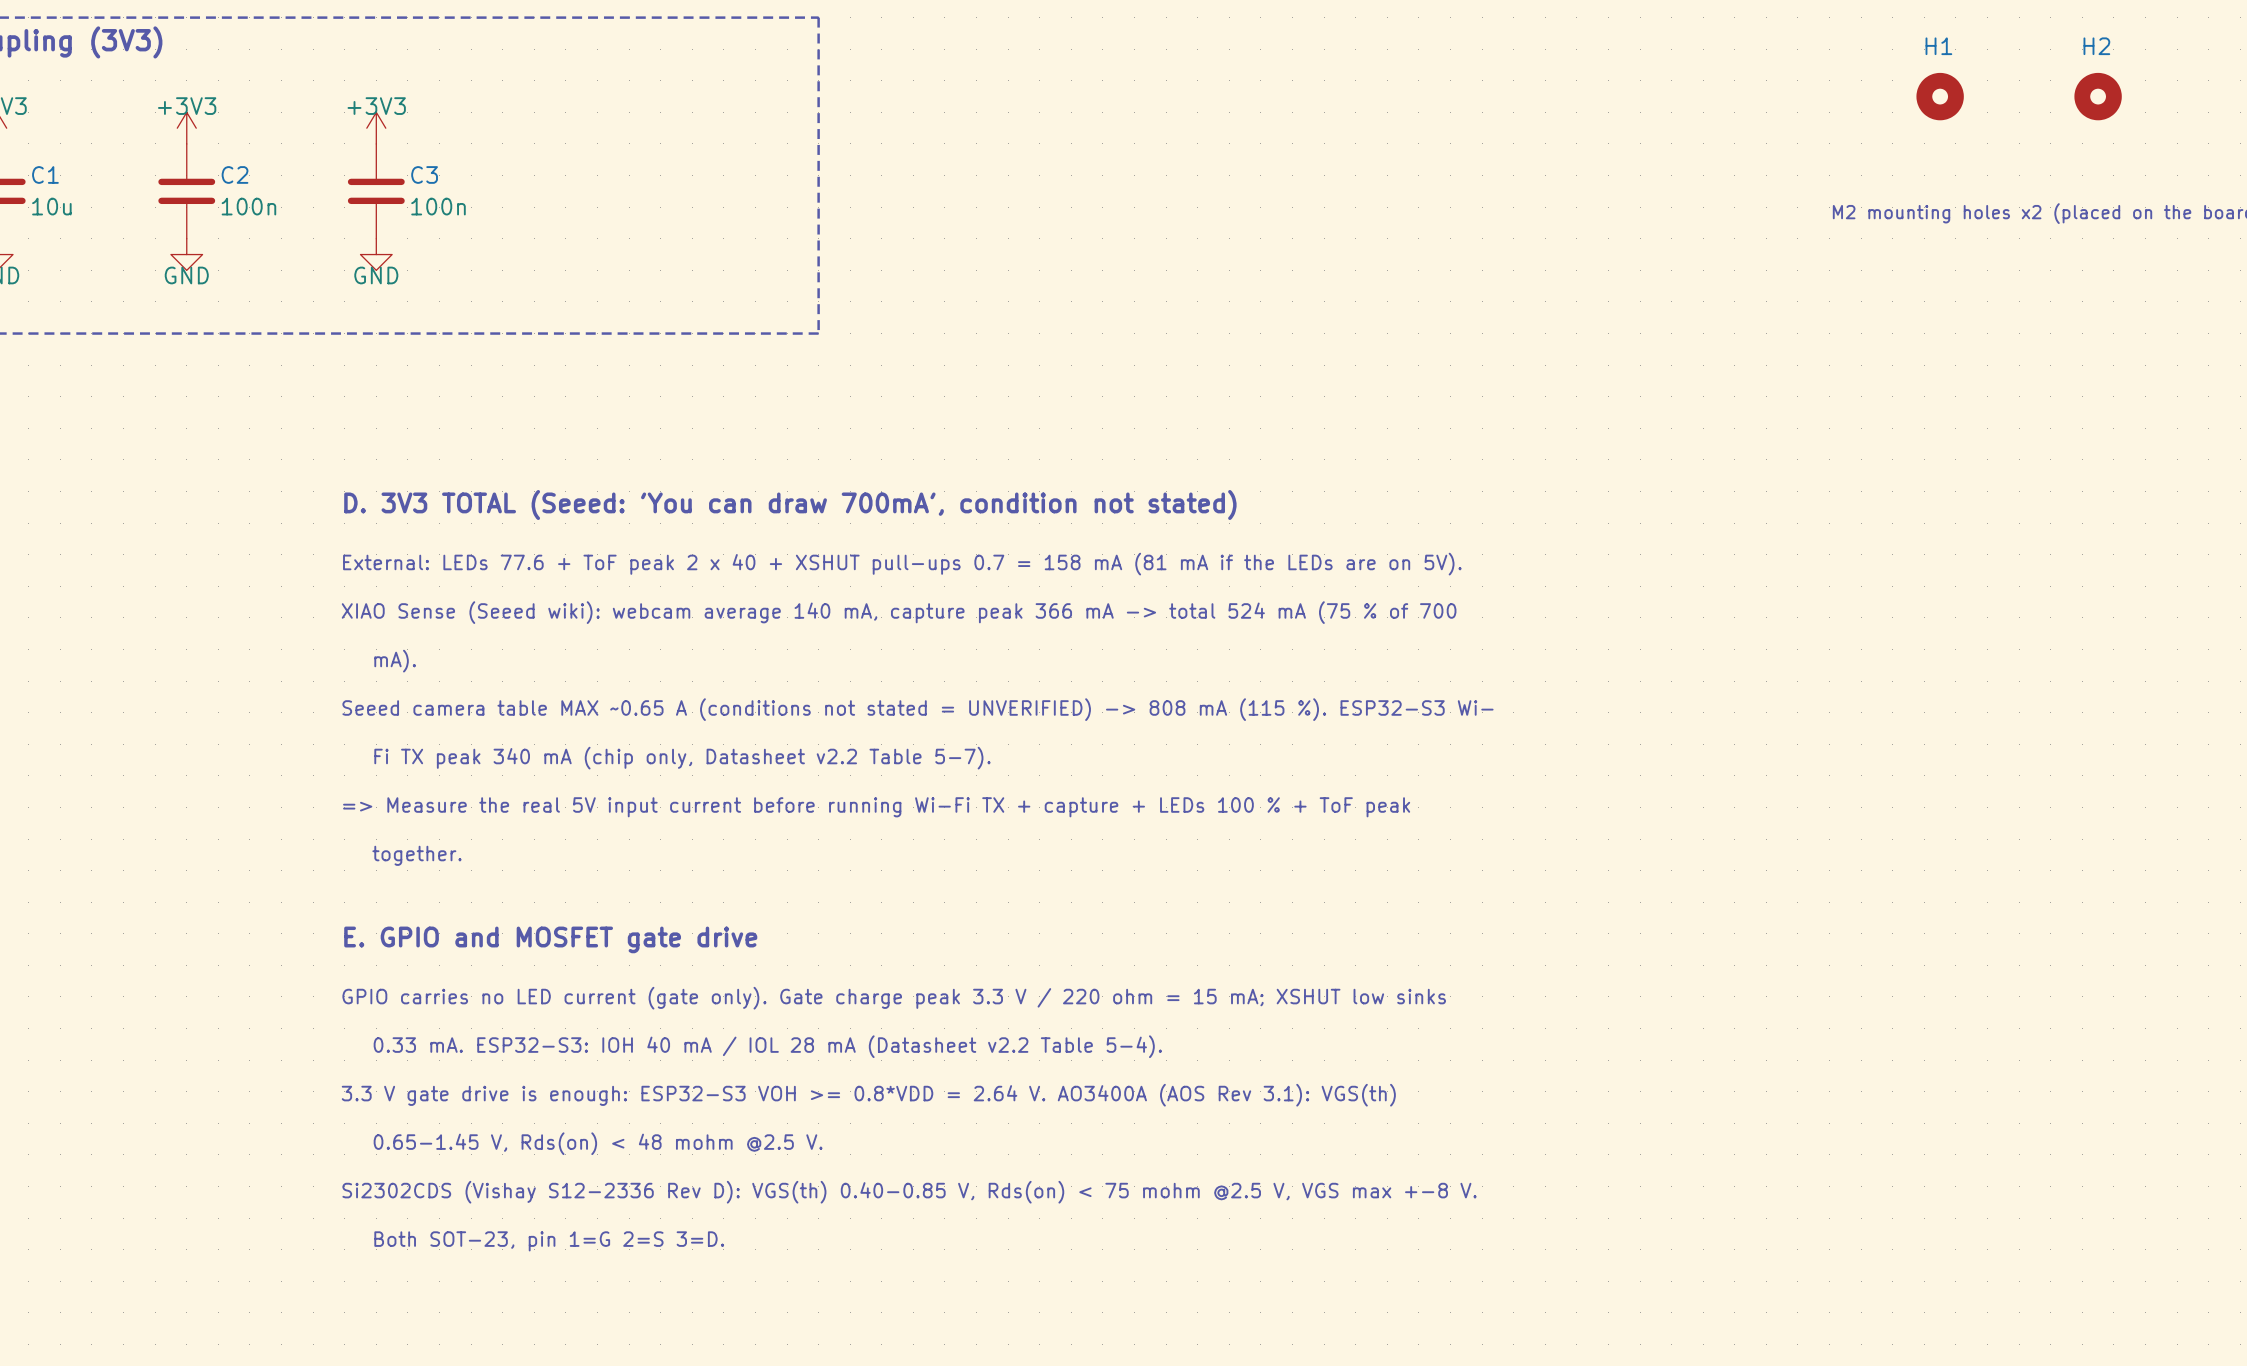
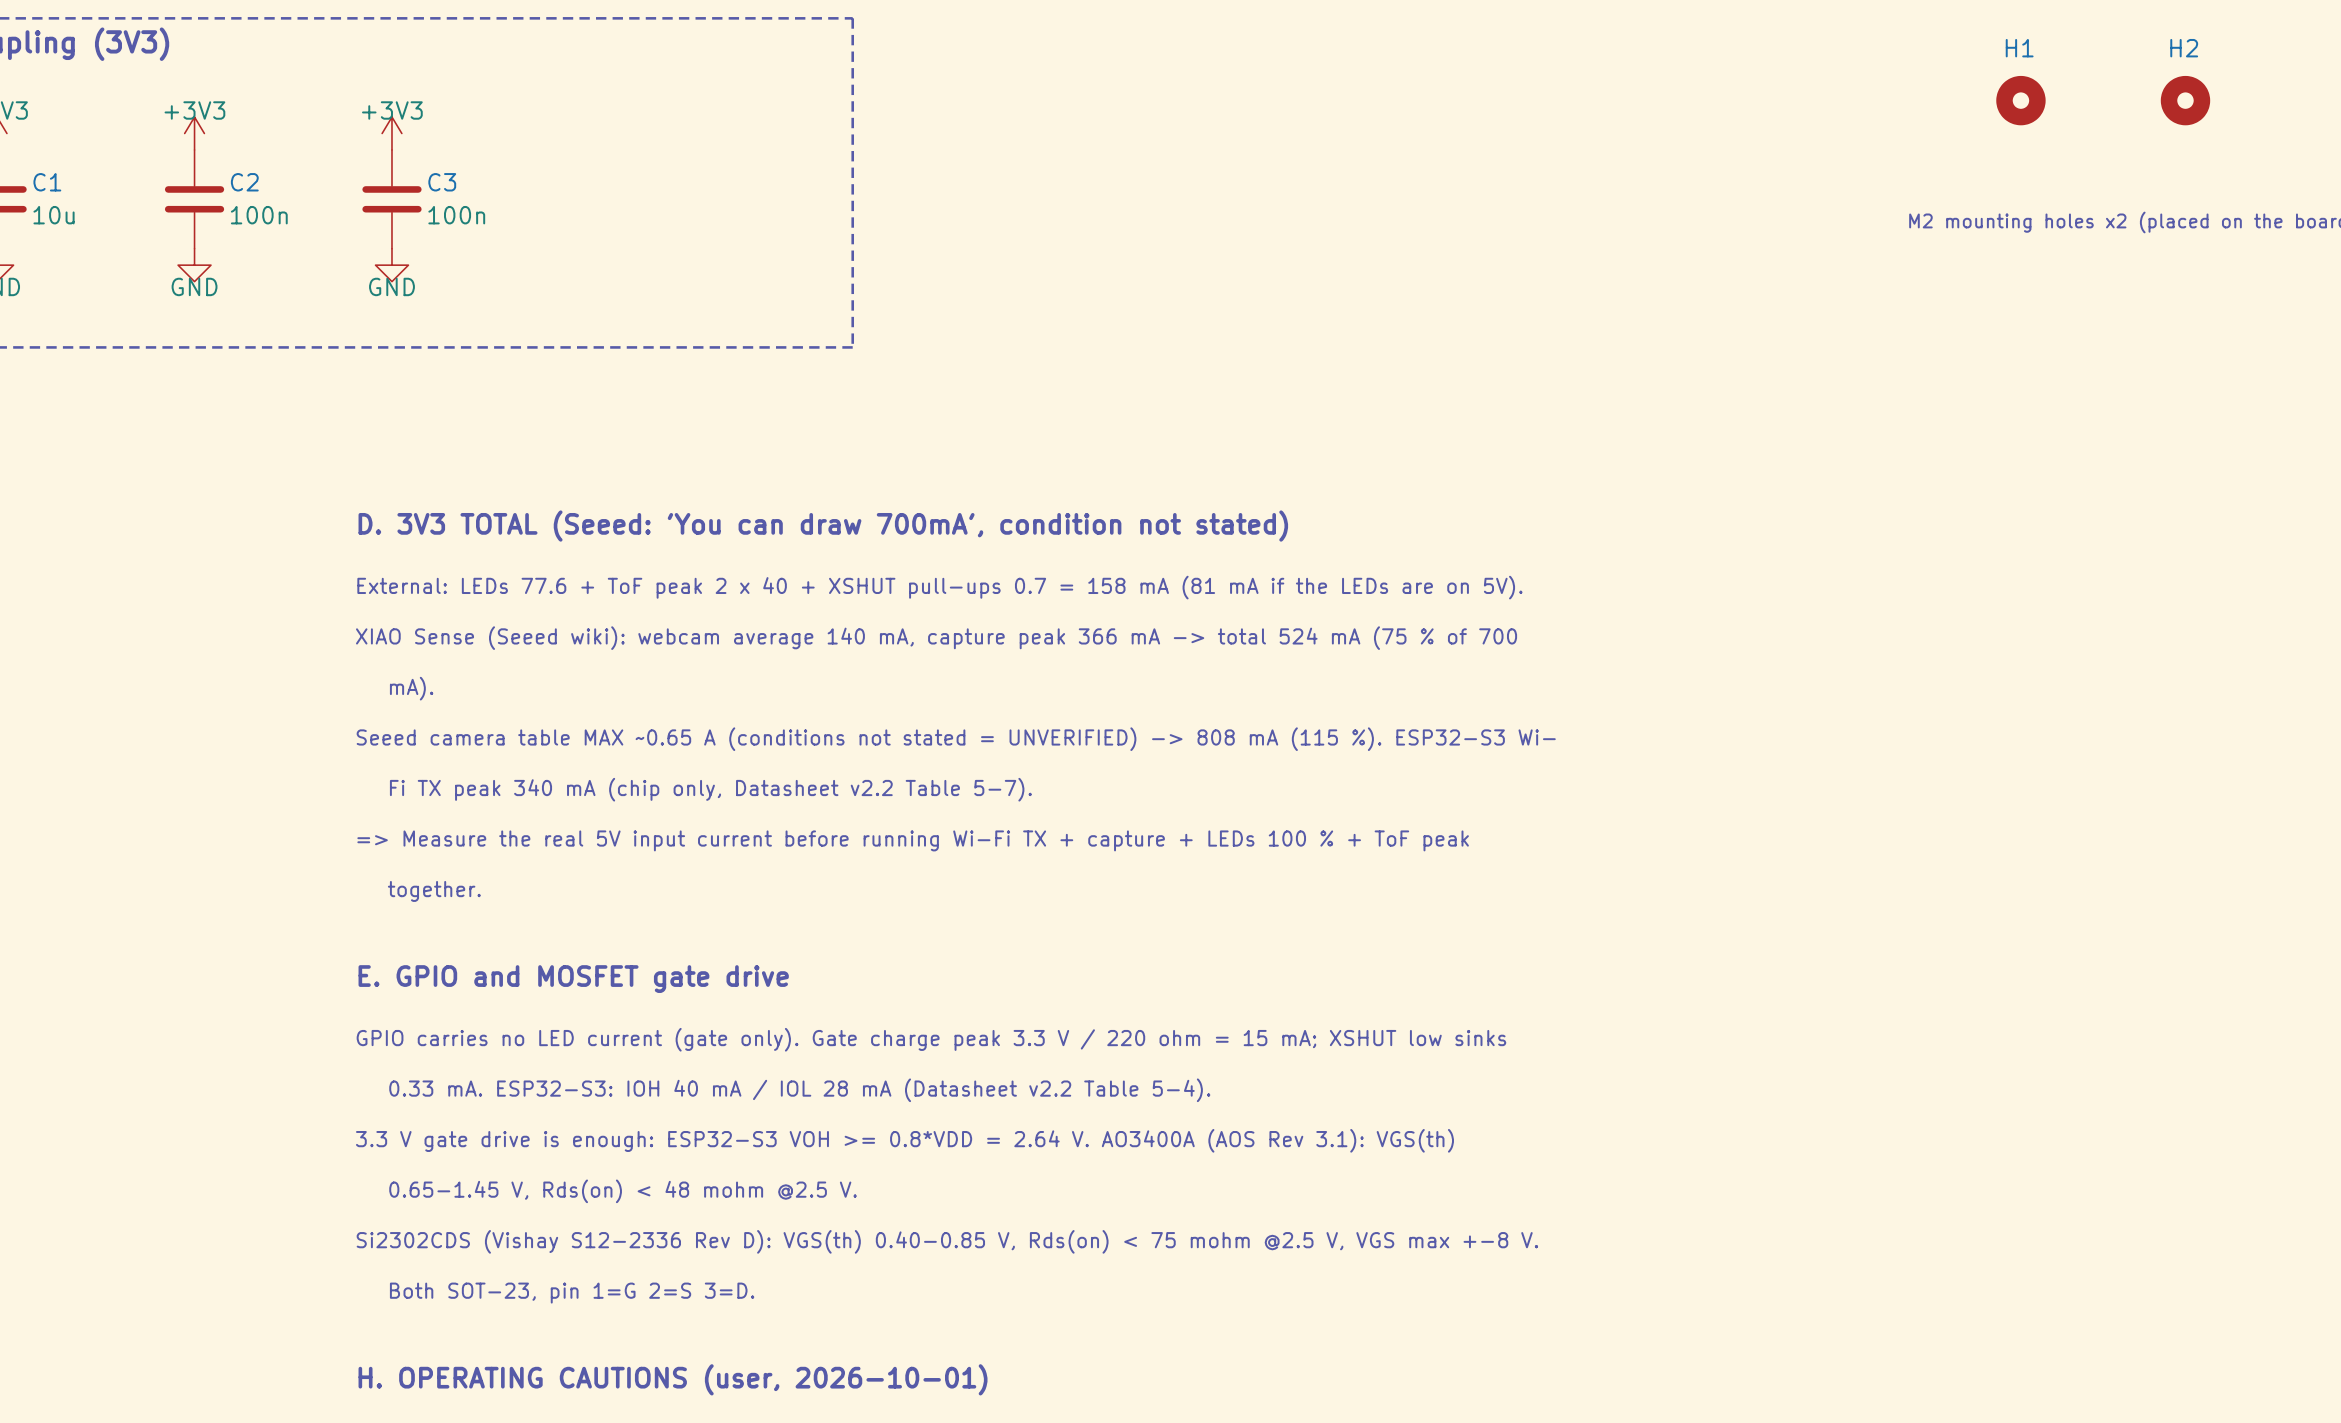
text: none -> H. OPERATING CAUTIONS (user, 2026-10-01) (673, 1379)

